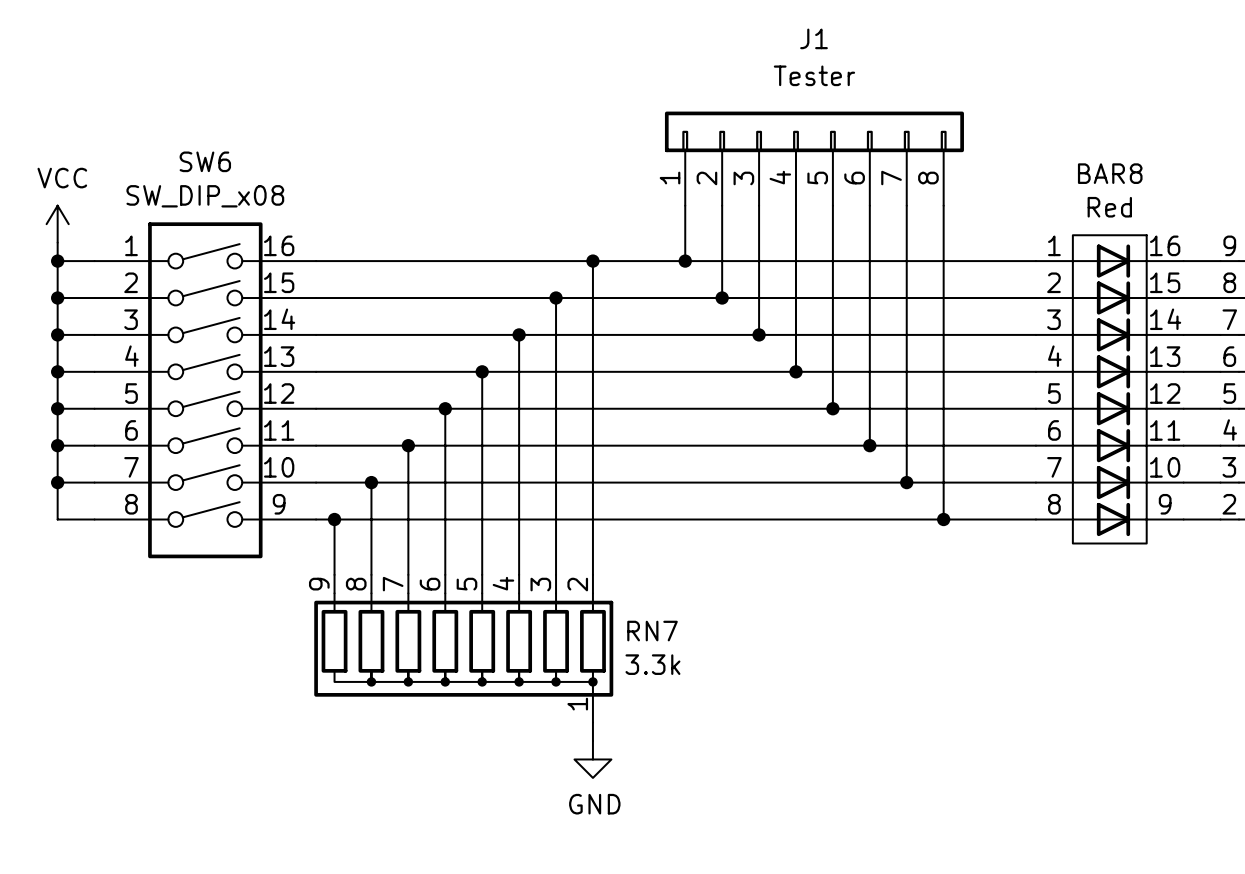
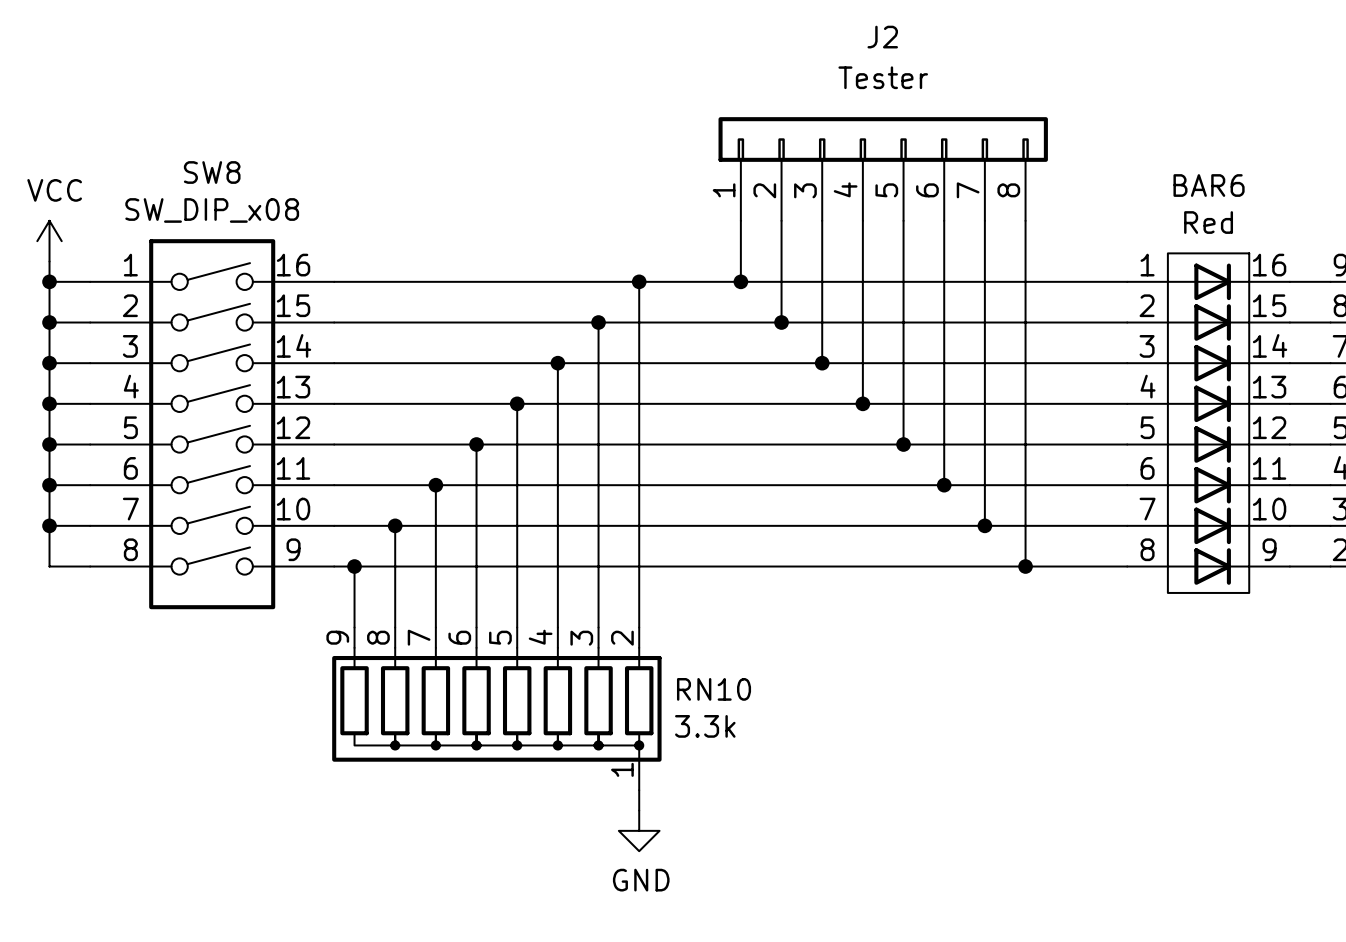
J1 name: J1 (814, 38) -> J2 (882, 37)
SW6 name: SW6 (205, 161) -> SW8 (212, 172)
BAR8 name: BAR8 (1110, 173) -> BAR6 (1209, 185)
RN7 name: RN7 (652, 631) -> RN10 (714, 689)

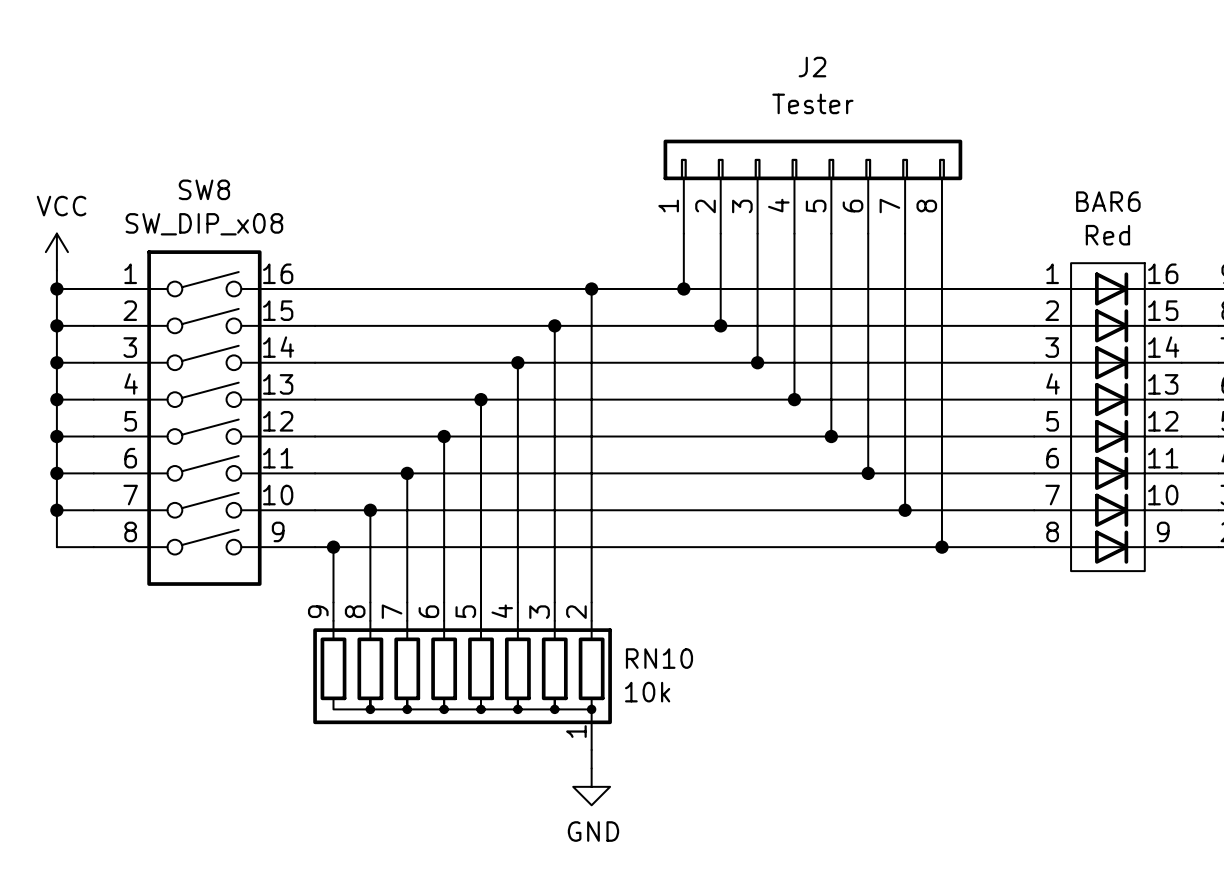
RN10 value: 3.3k (705, 726) -> 10k (647, 692)

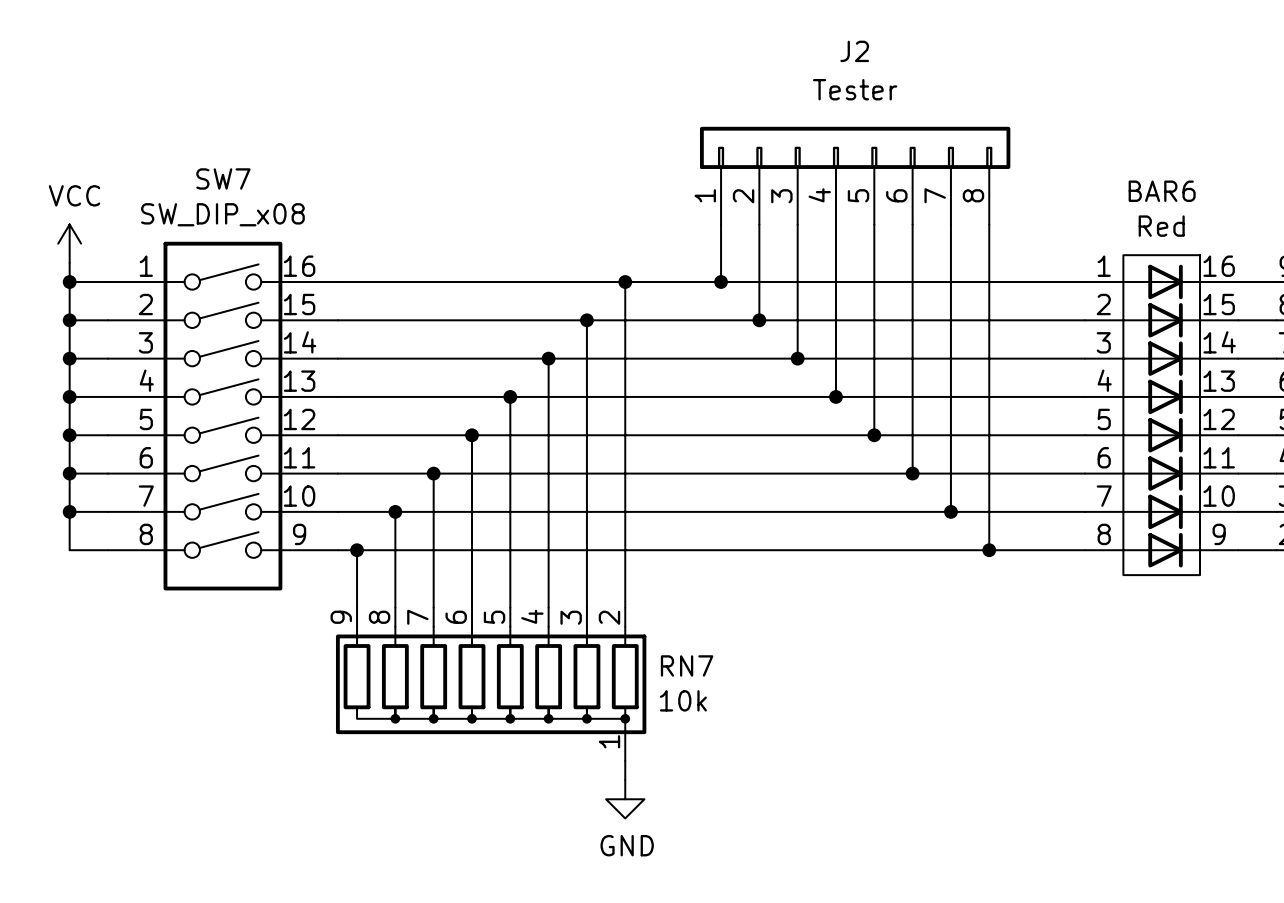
SW8 name: SW8 (204, 189) -> SW7 (223, 178)
RN10 name: RN10 (659, 658) -> RN7 (687, 665)

